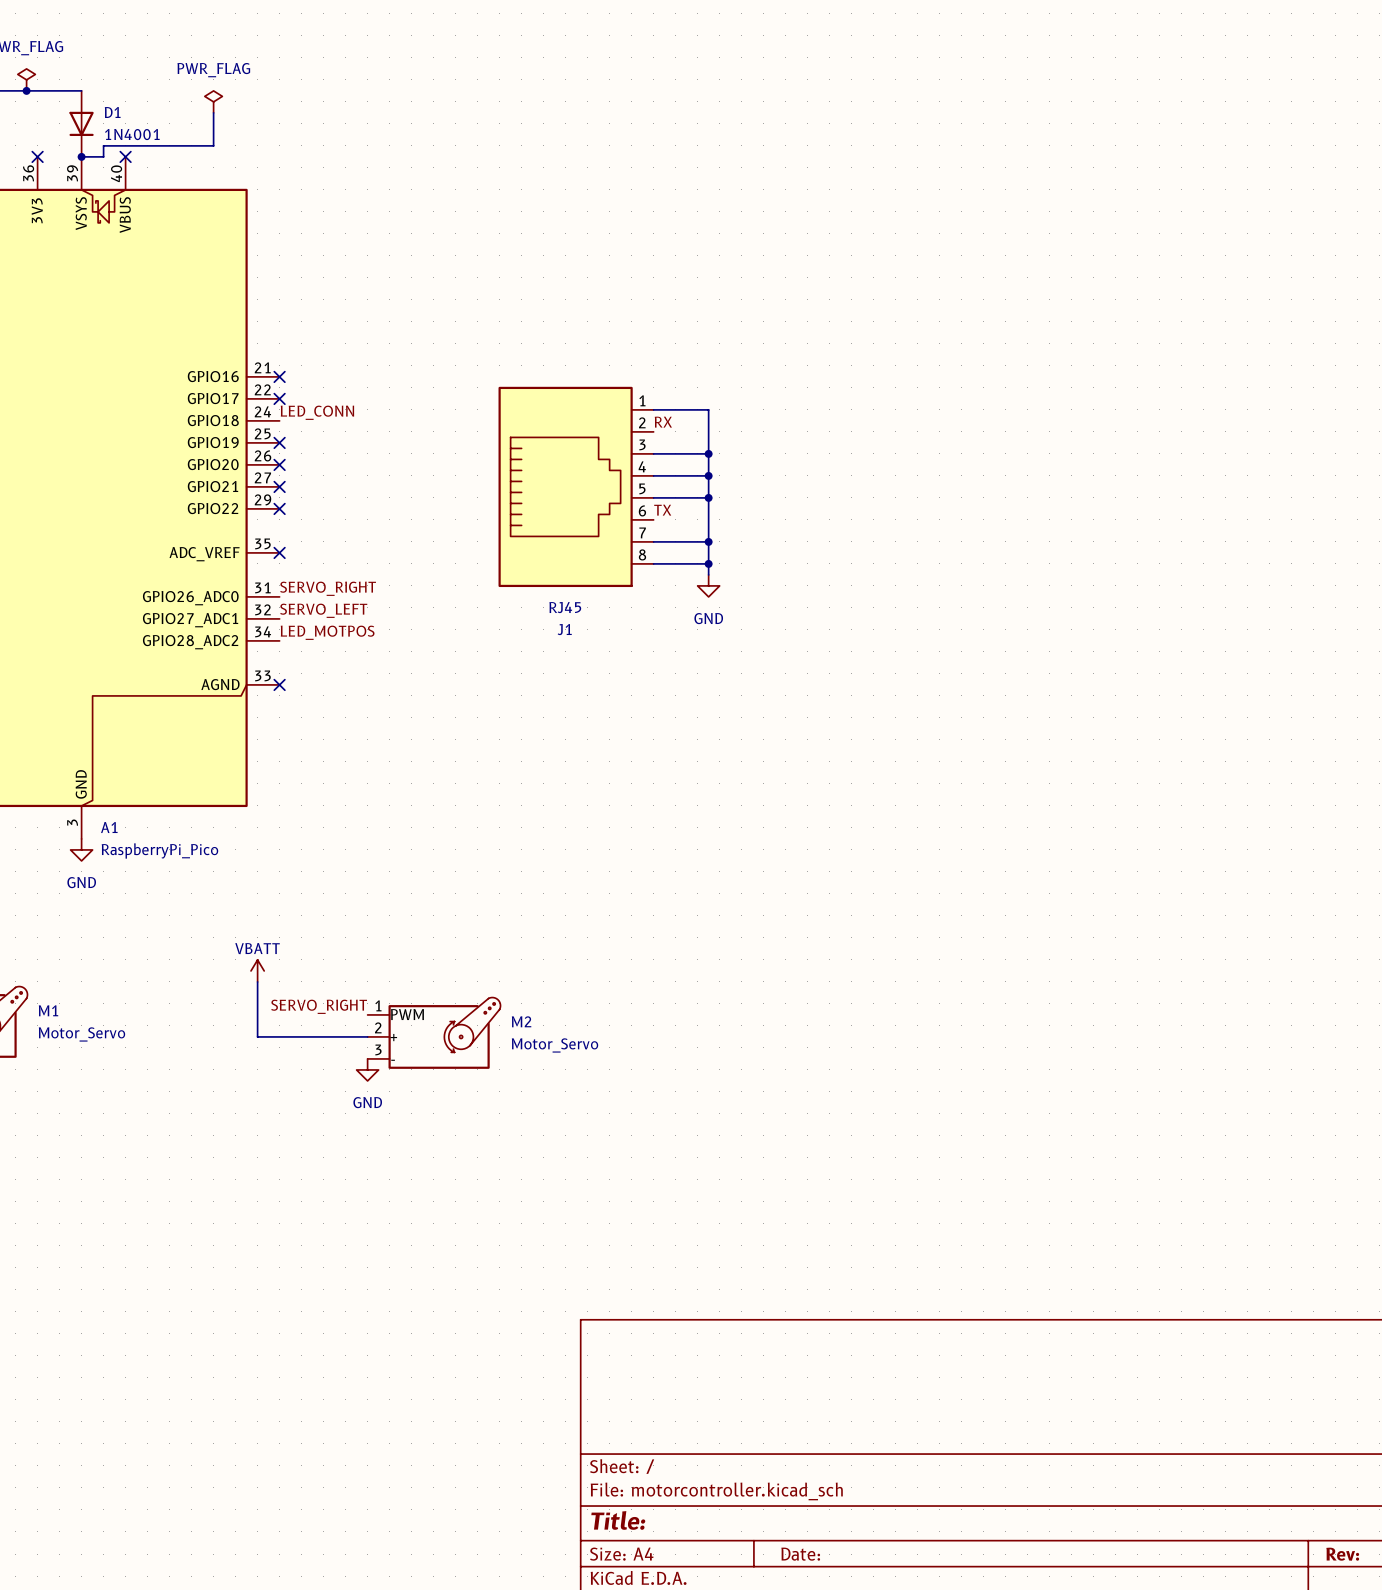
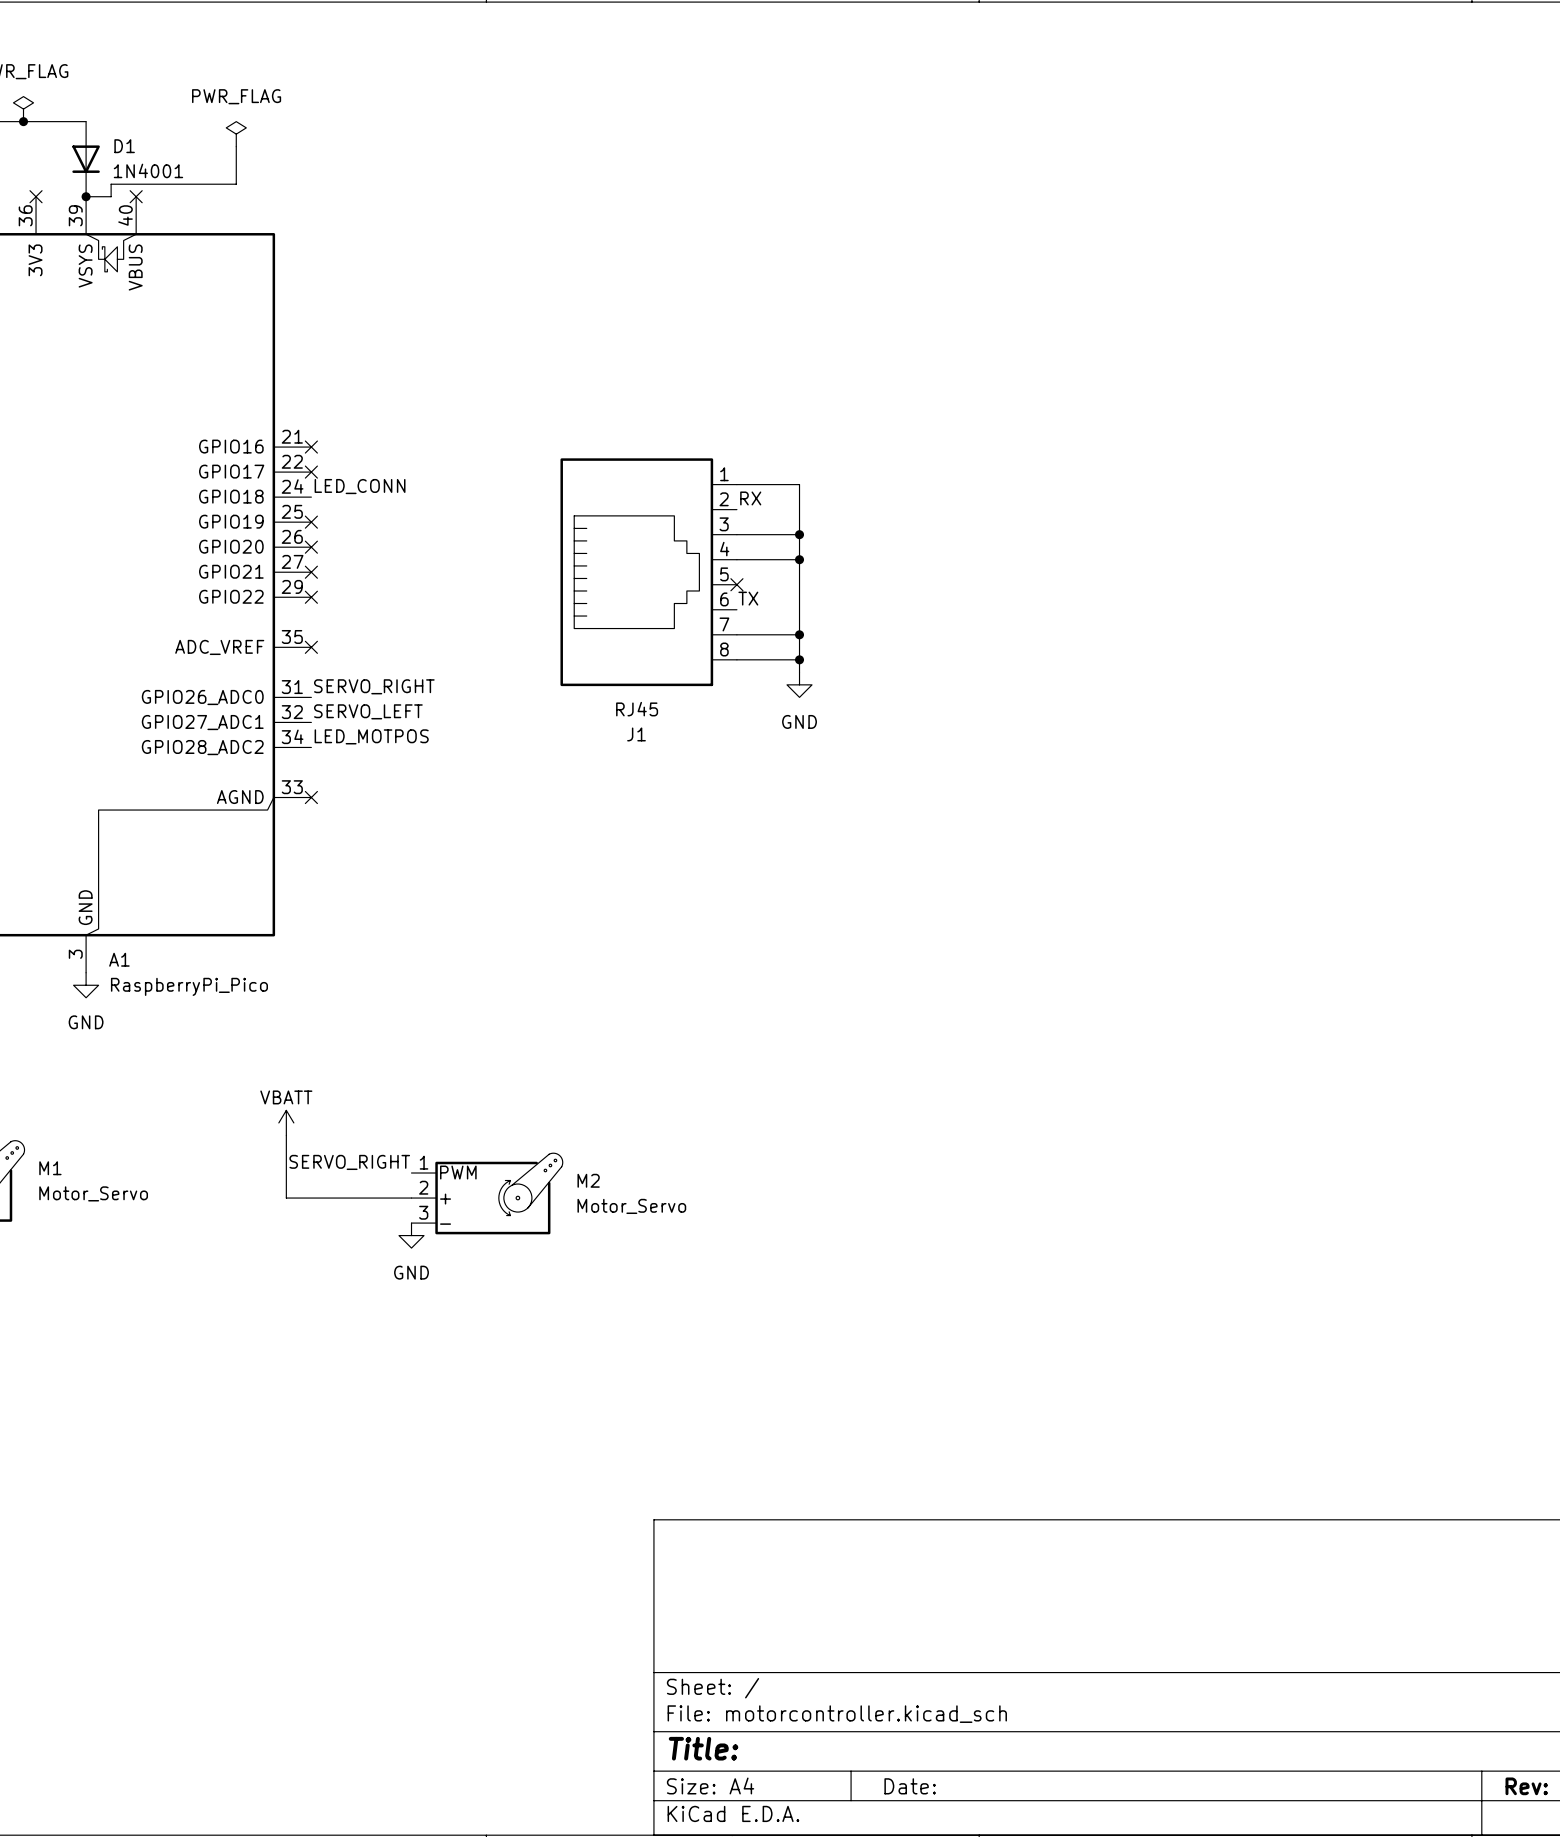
wire: (653, 497) (708, 497) -> none
no-connect mark: none -> (736, 584)
junction: (708, 497) -> none

